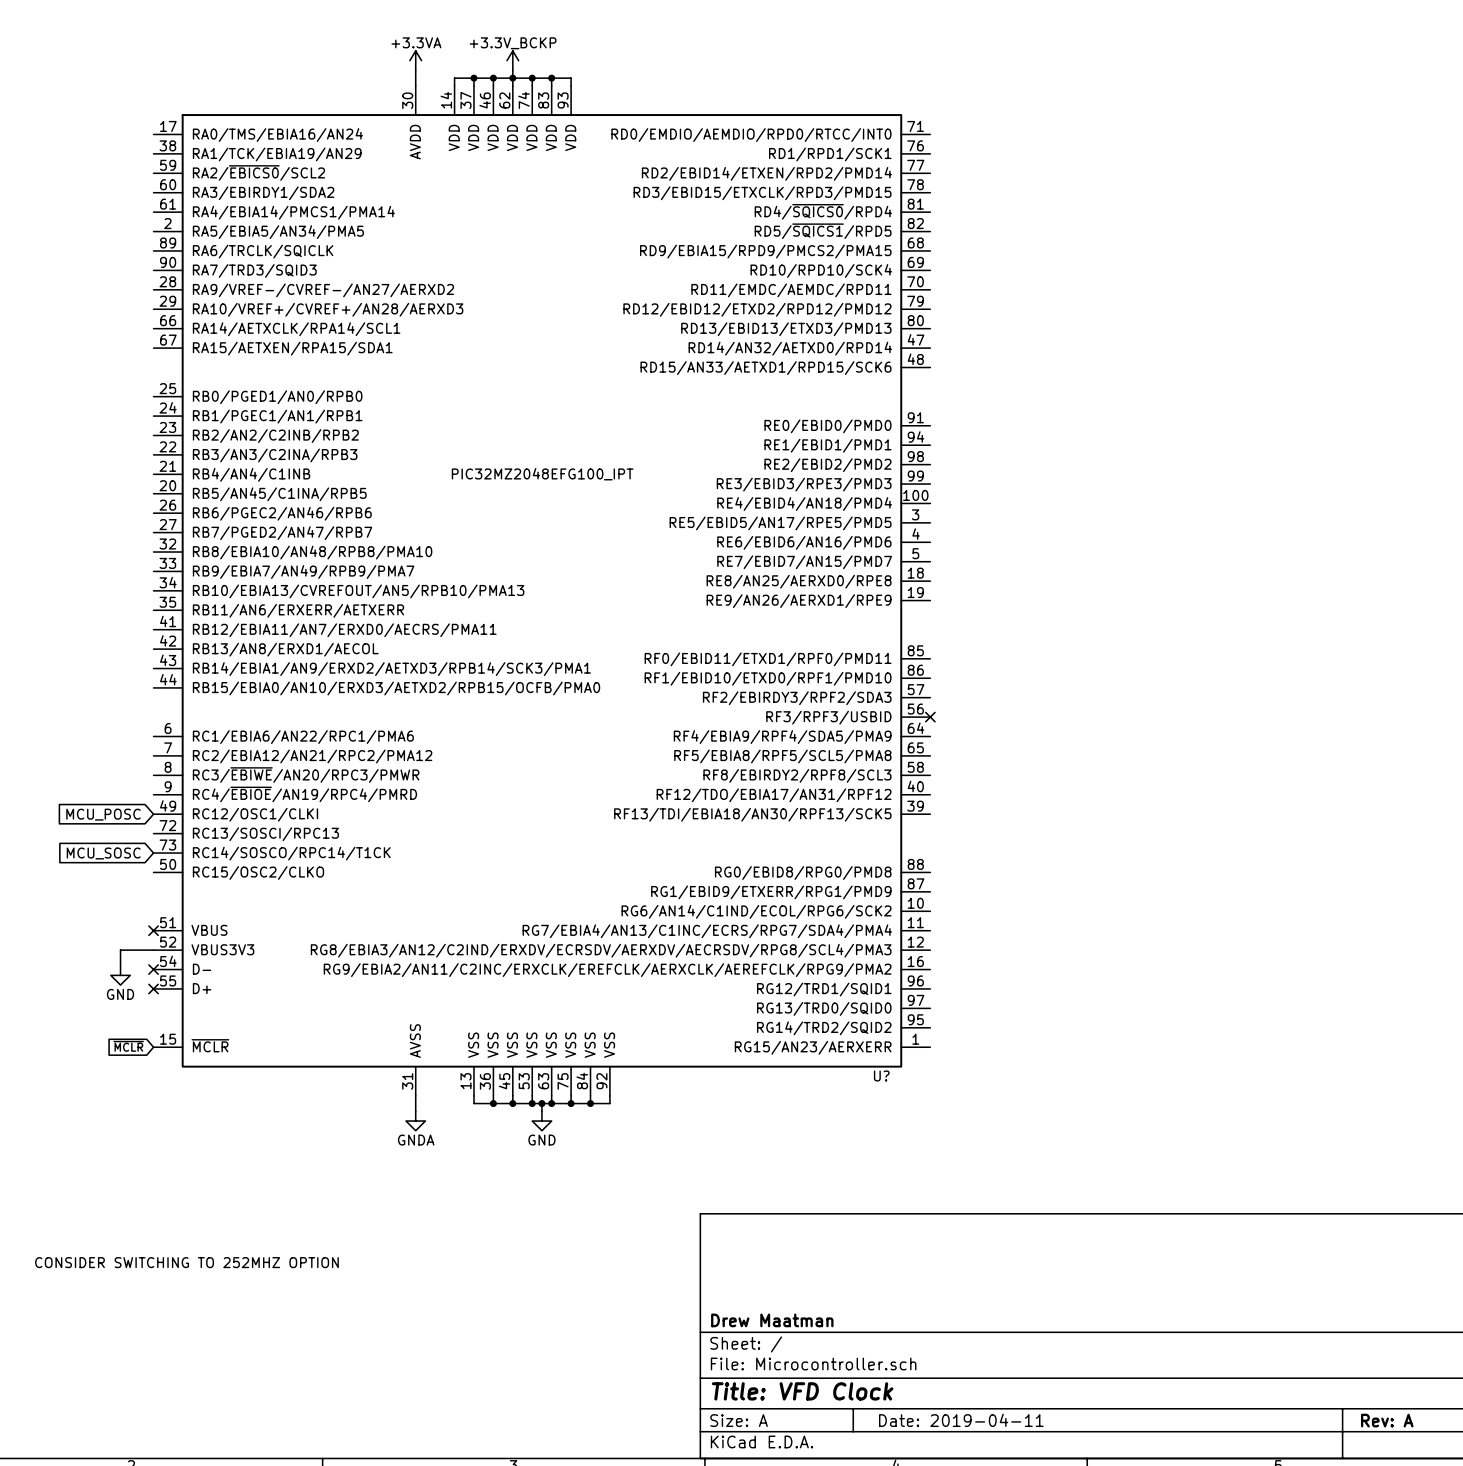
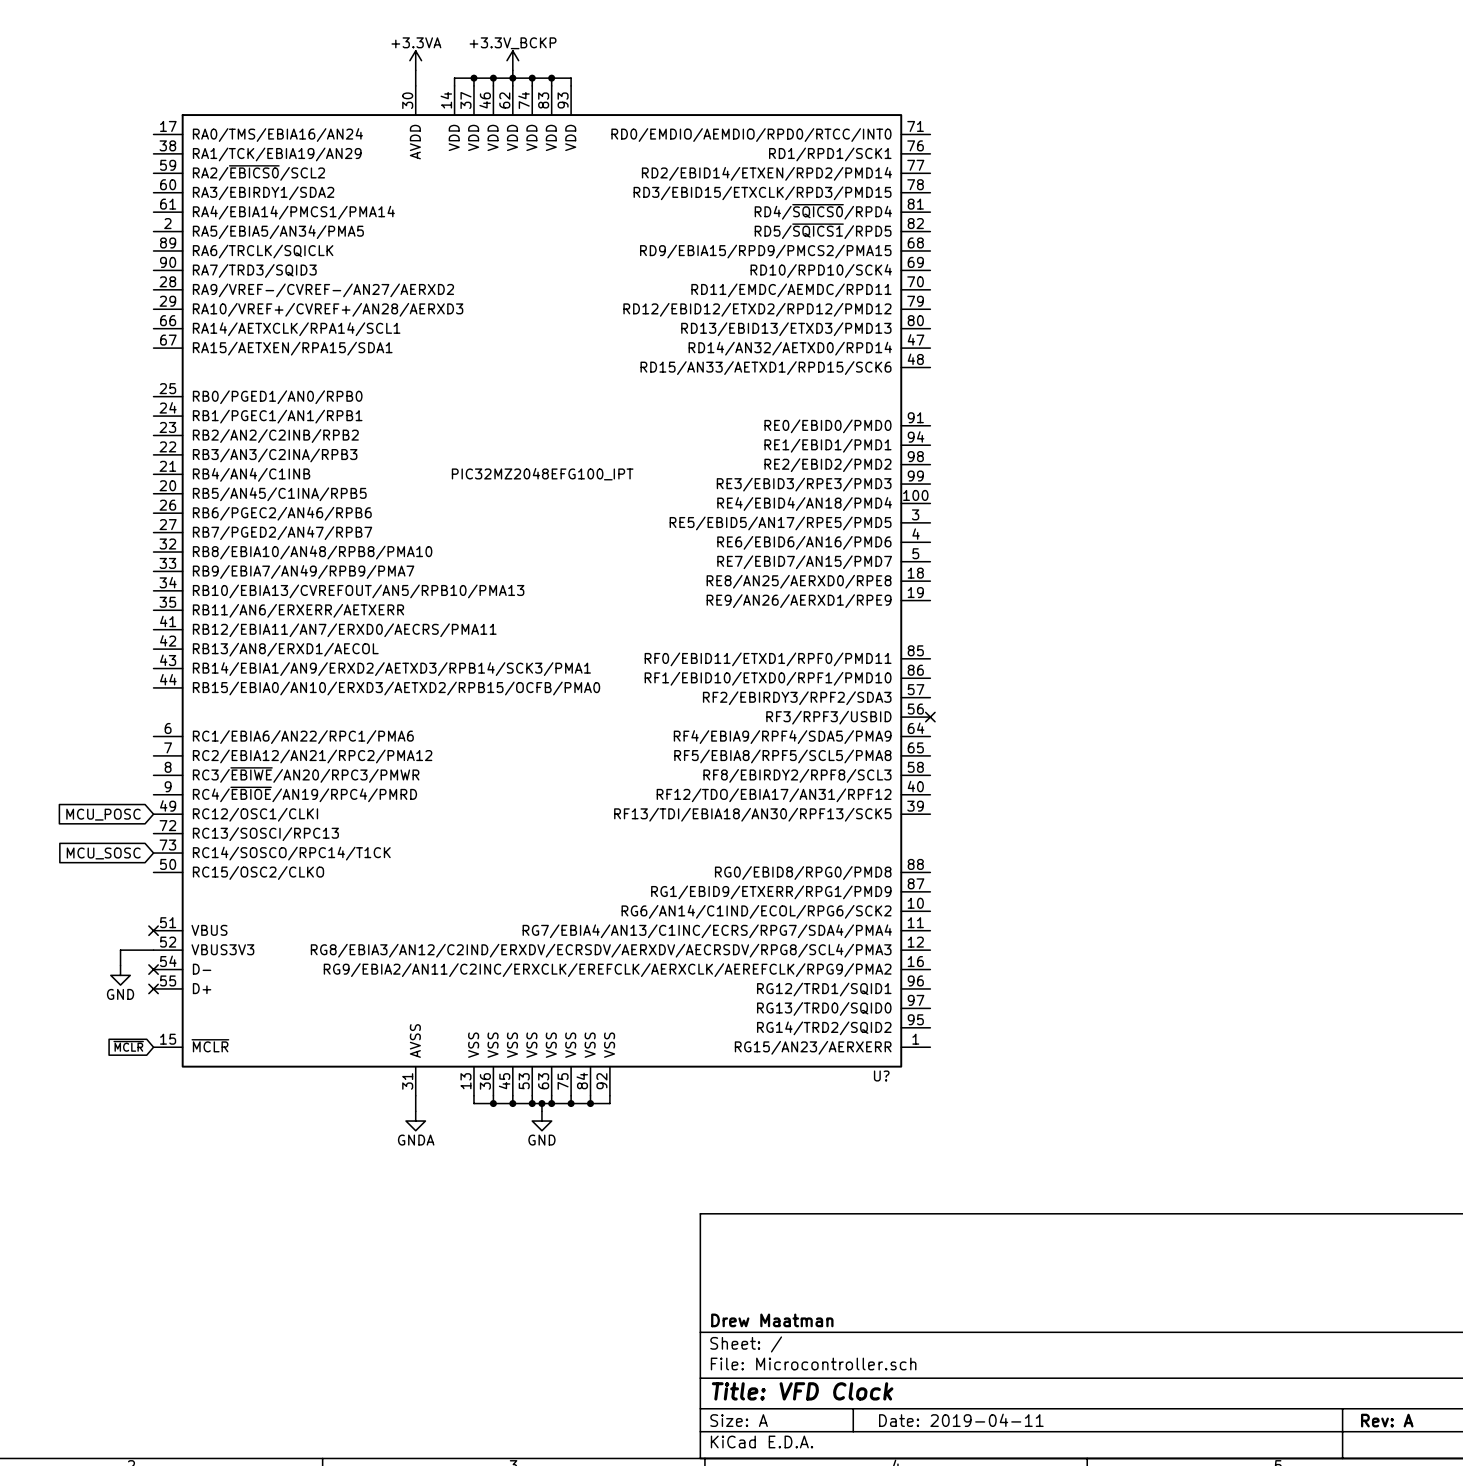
text: CONSIDER SWITCHING TO 252MHZ OPTION (186, 1262) -> none

